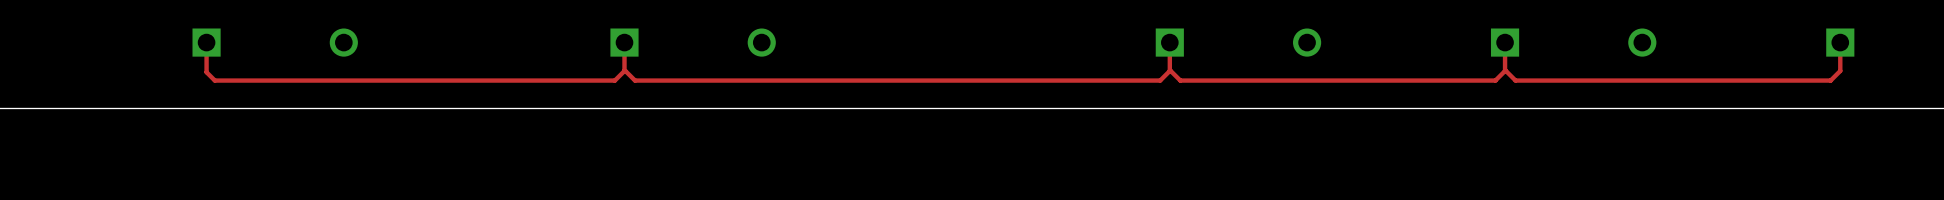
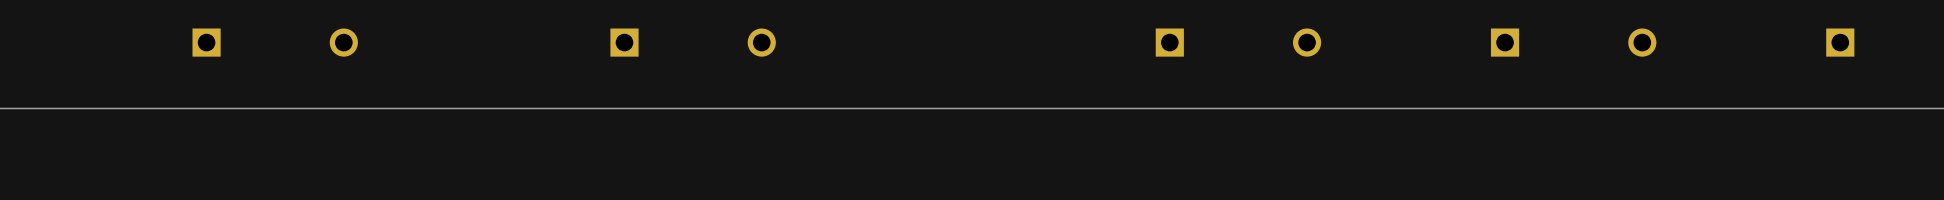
track: (206, 42) (206, 72) (214, 80) (614, 80) (624, 70) -> none
track: (624, 42) (624, 70) -> none
track: (1169, 42) (1169, 70) -> none
track: (1505, 42) (1505, 70) -> none
track: (1840, 42) (1840, 70) (1830, 80) (1515, 80) (1505, 70) -> none
track: (624, 70) (635, 80) (1160, 80) (1169, 70) -> none
track: (1169, 70) (1180, 80) (1495, 80) (1505, 70) -> none

